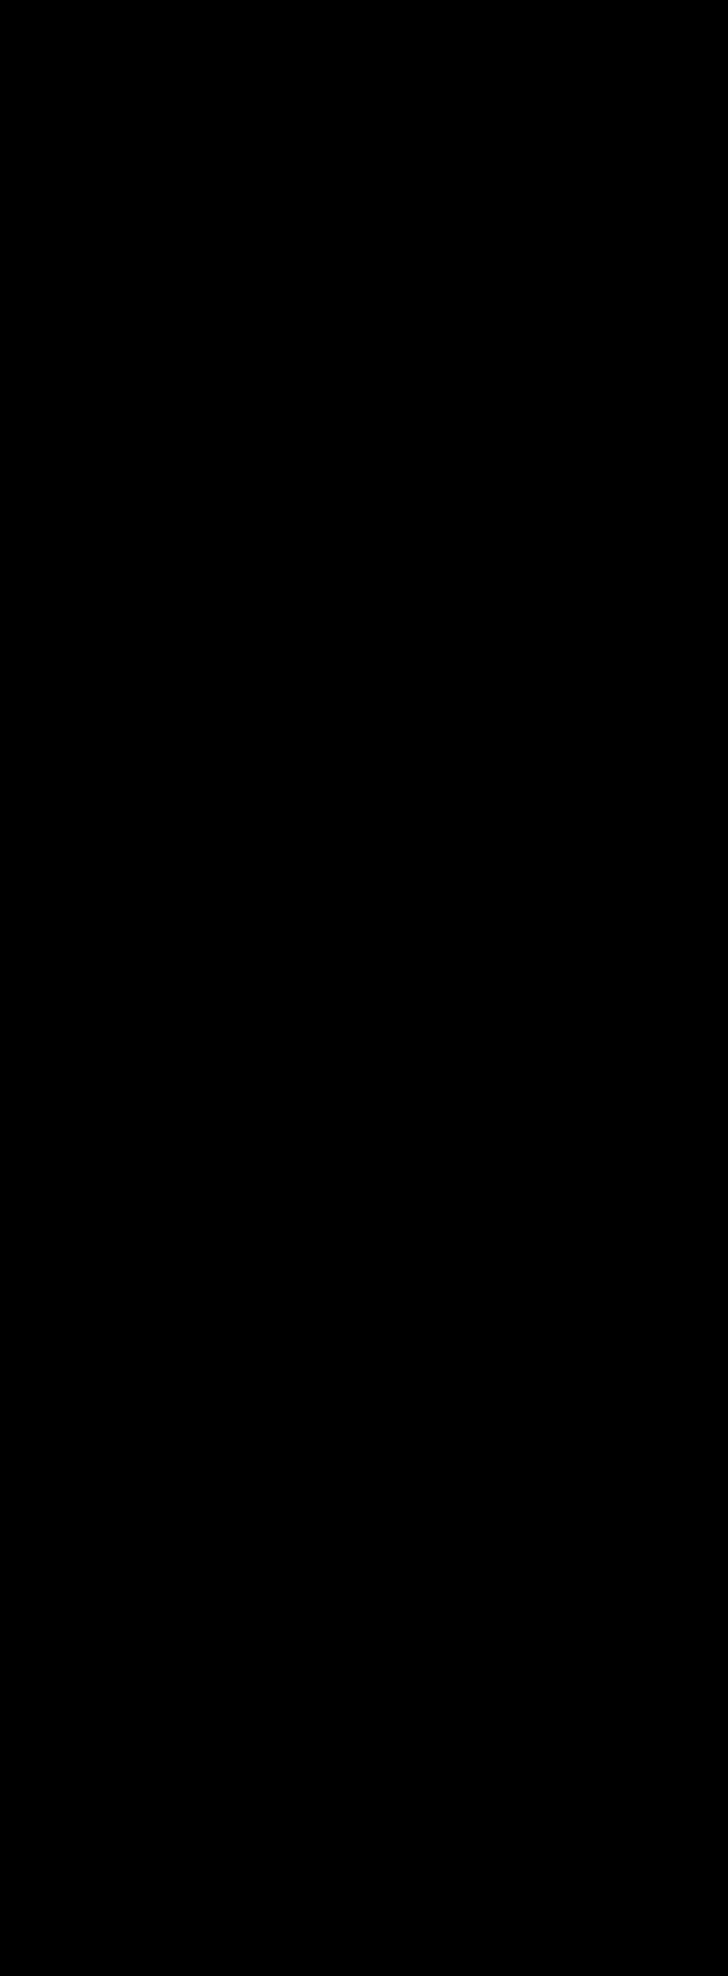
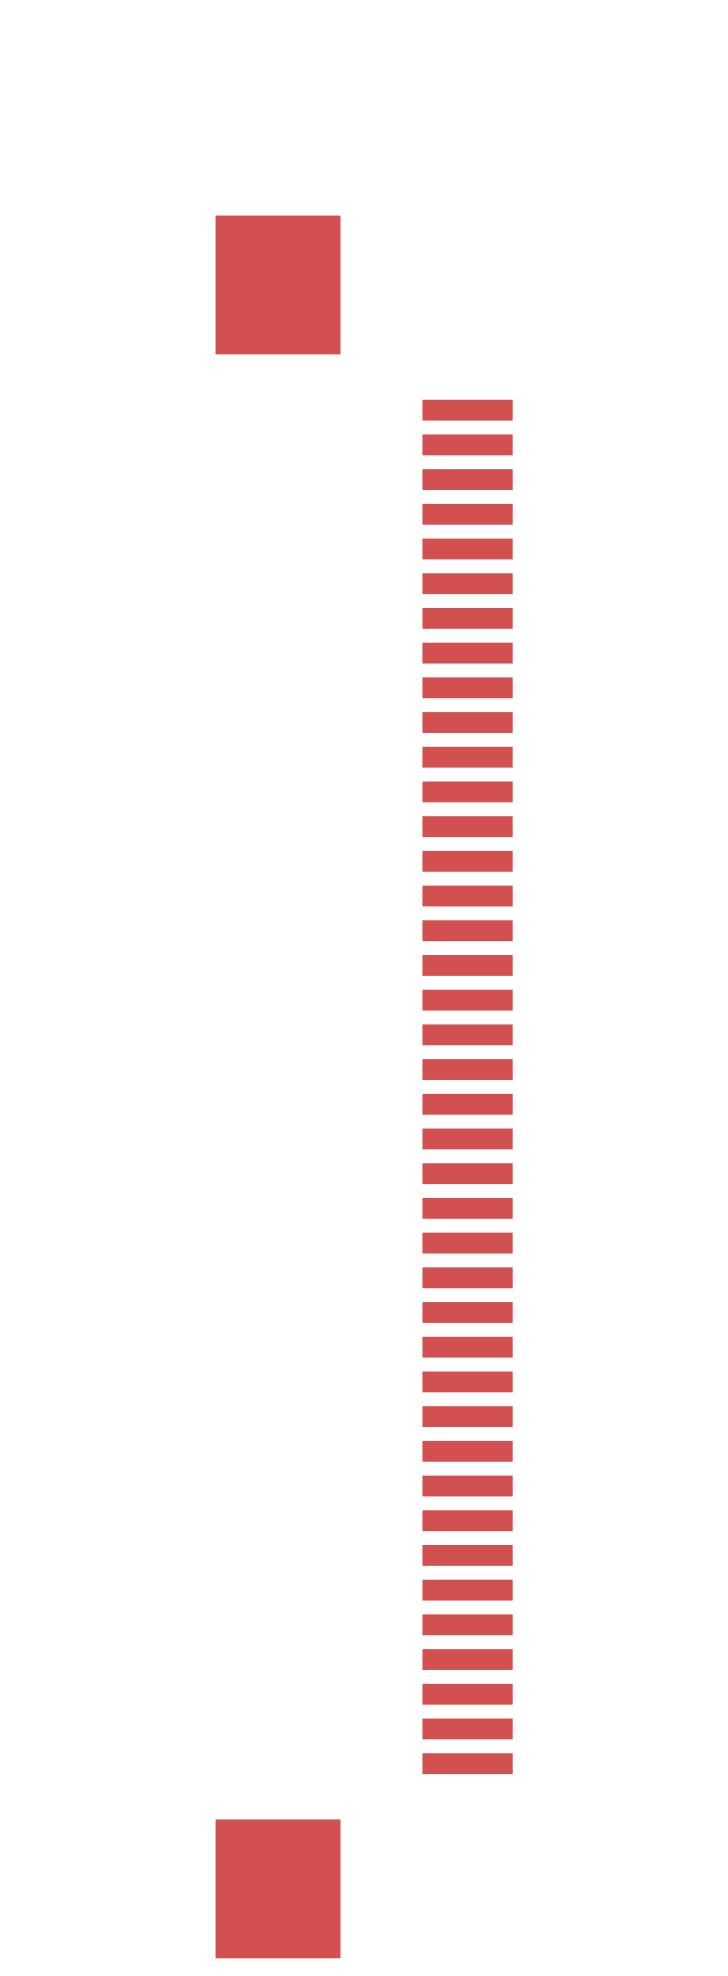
part: none -> (364, 1086)

